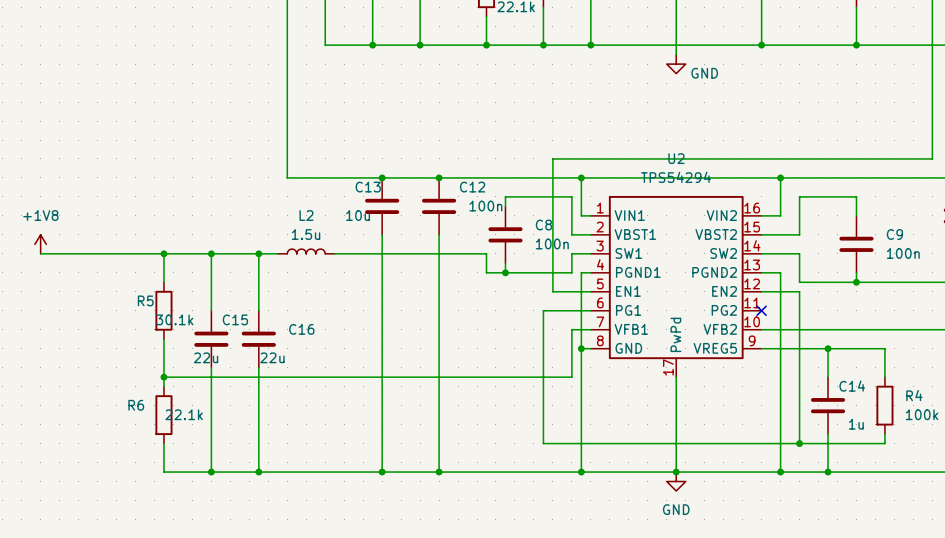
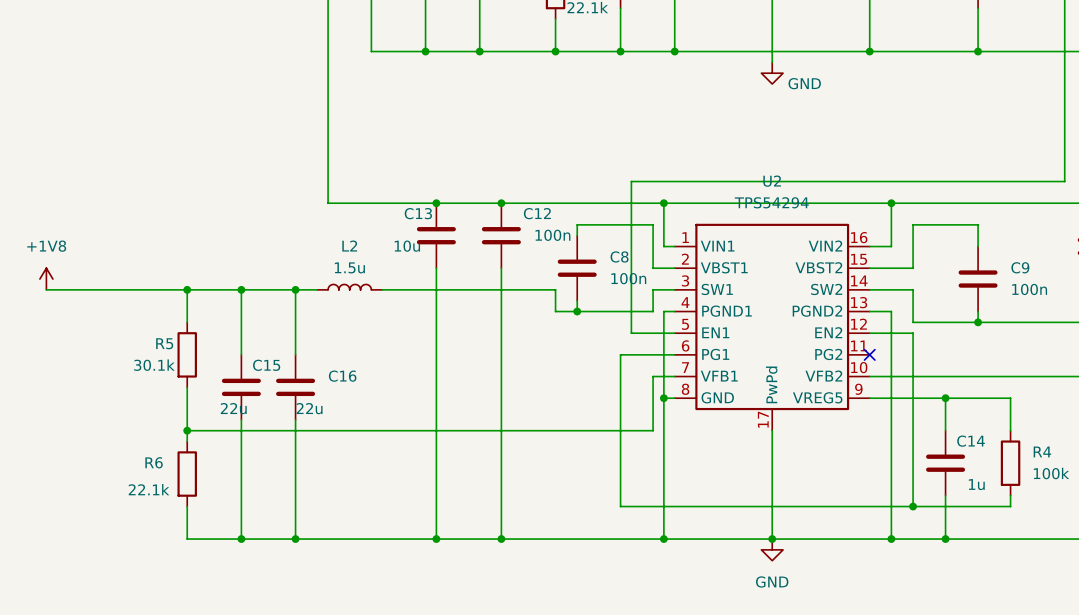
R5 value position: 30.1k (174, 319) -> 30.1k (154, 365)
R6 value position: 22.1k (184, 414) -> 22.1k (149, 489)

